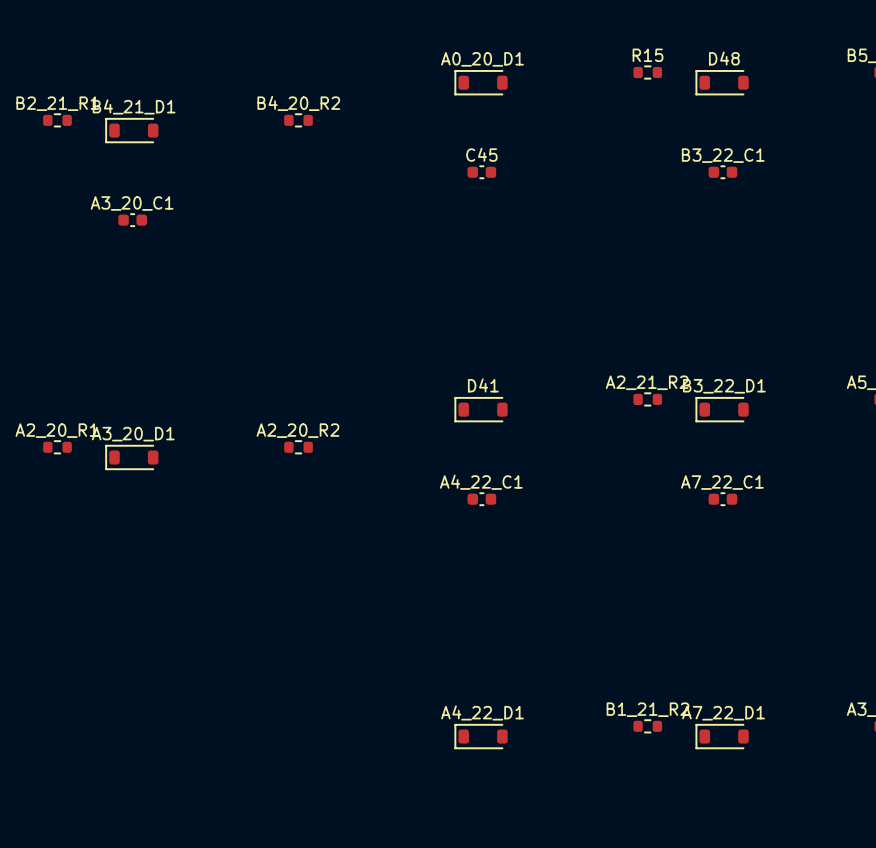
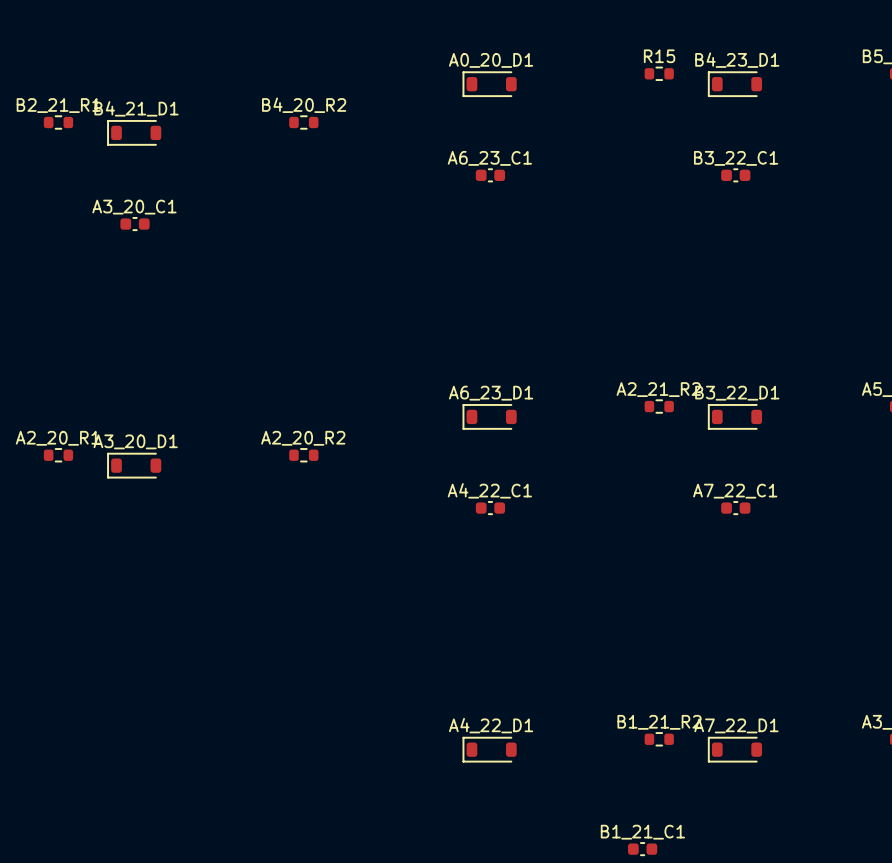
D48 name: D48 (724, 58) -> B4_23_D1 (737, 60)
C45 name: C45 (481, 154) -> A6_23_C1 (489, 158)
D41 name: D41 (483, 385) -> A6_23_D1 (491, 393)
B1_21_C1: none -> (642, 849)

